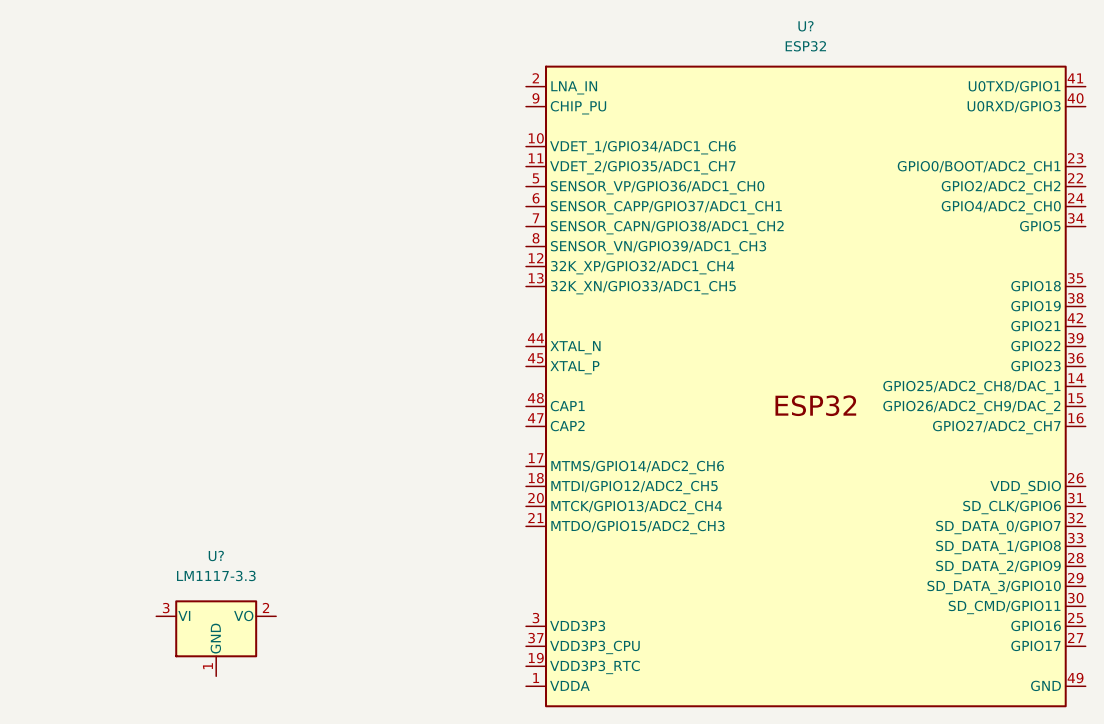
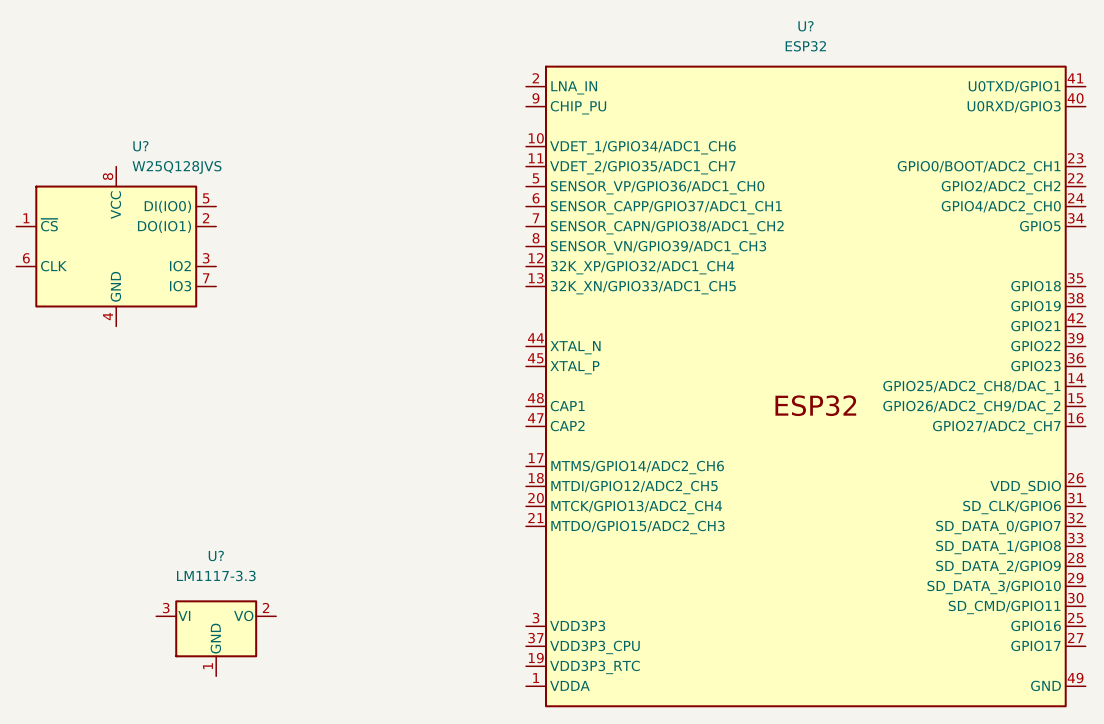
U?: none -> W25Q128JVS (116, 246)

